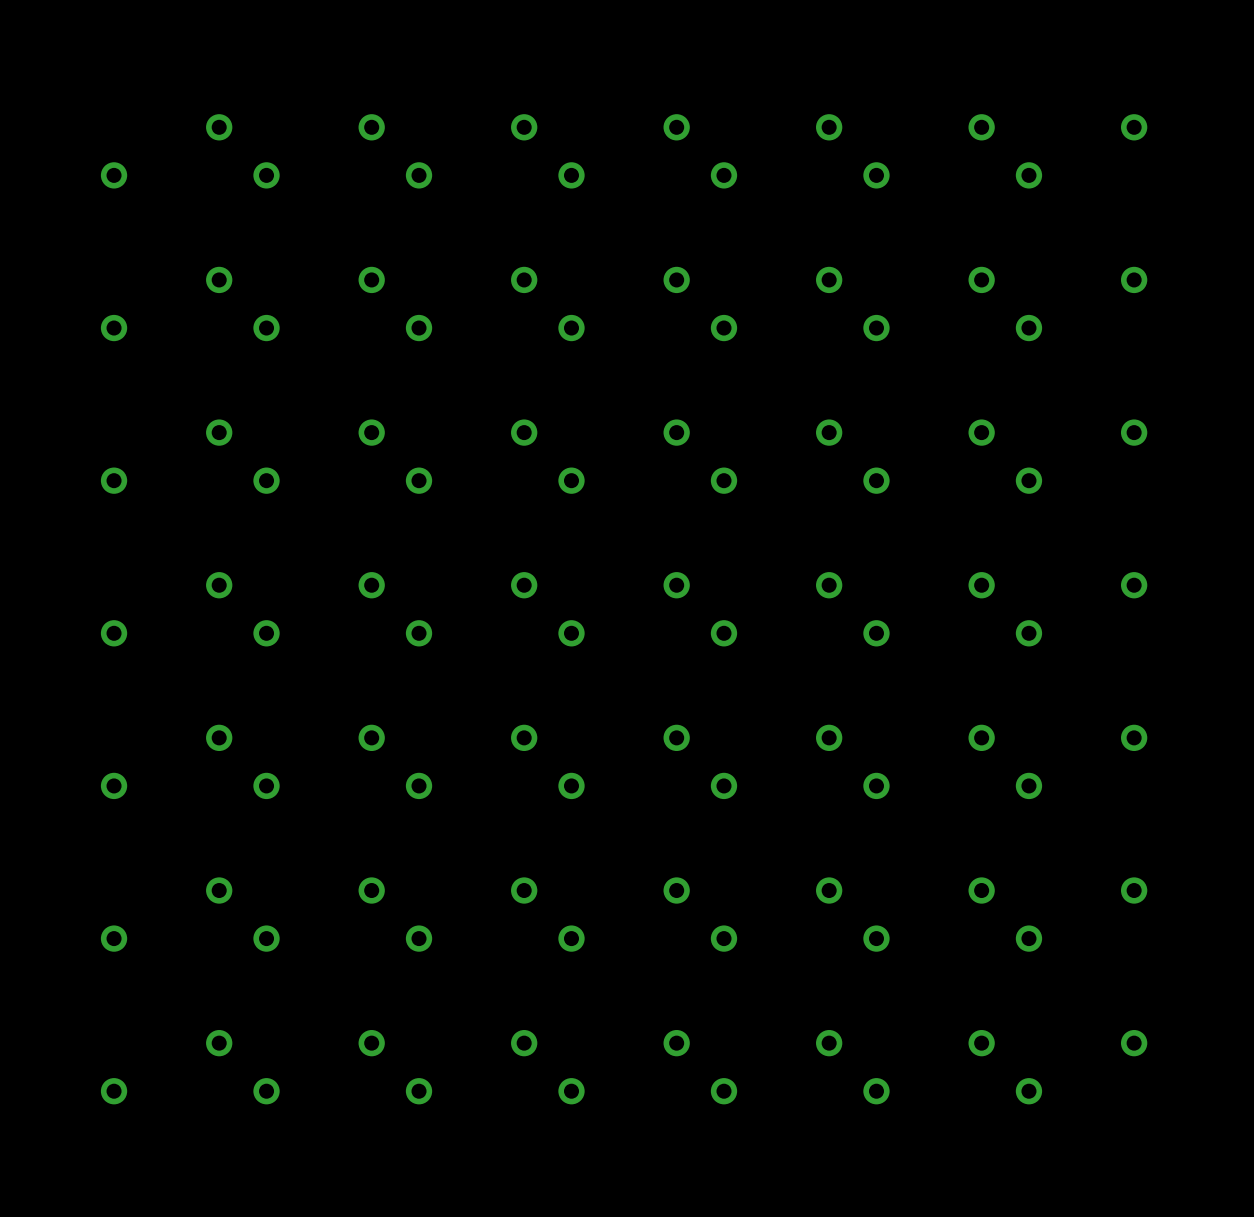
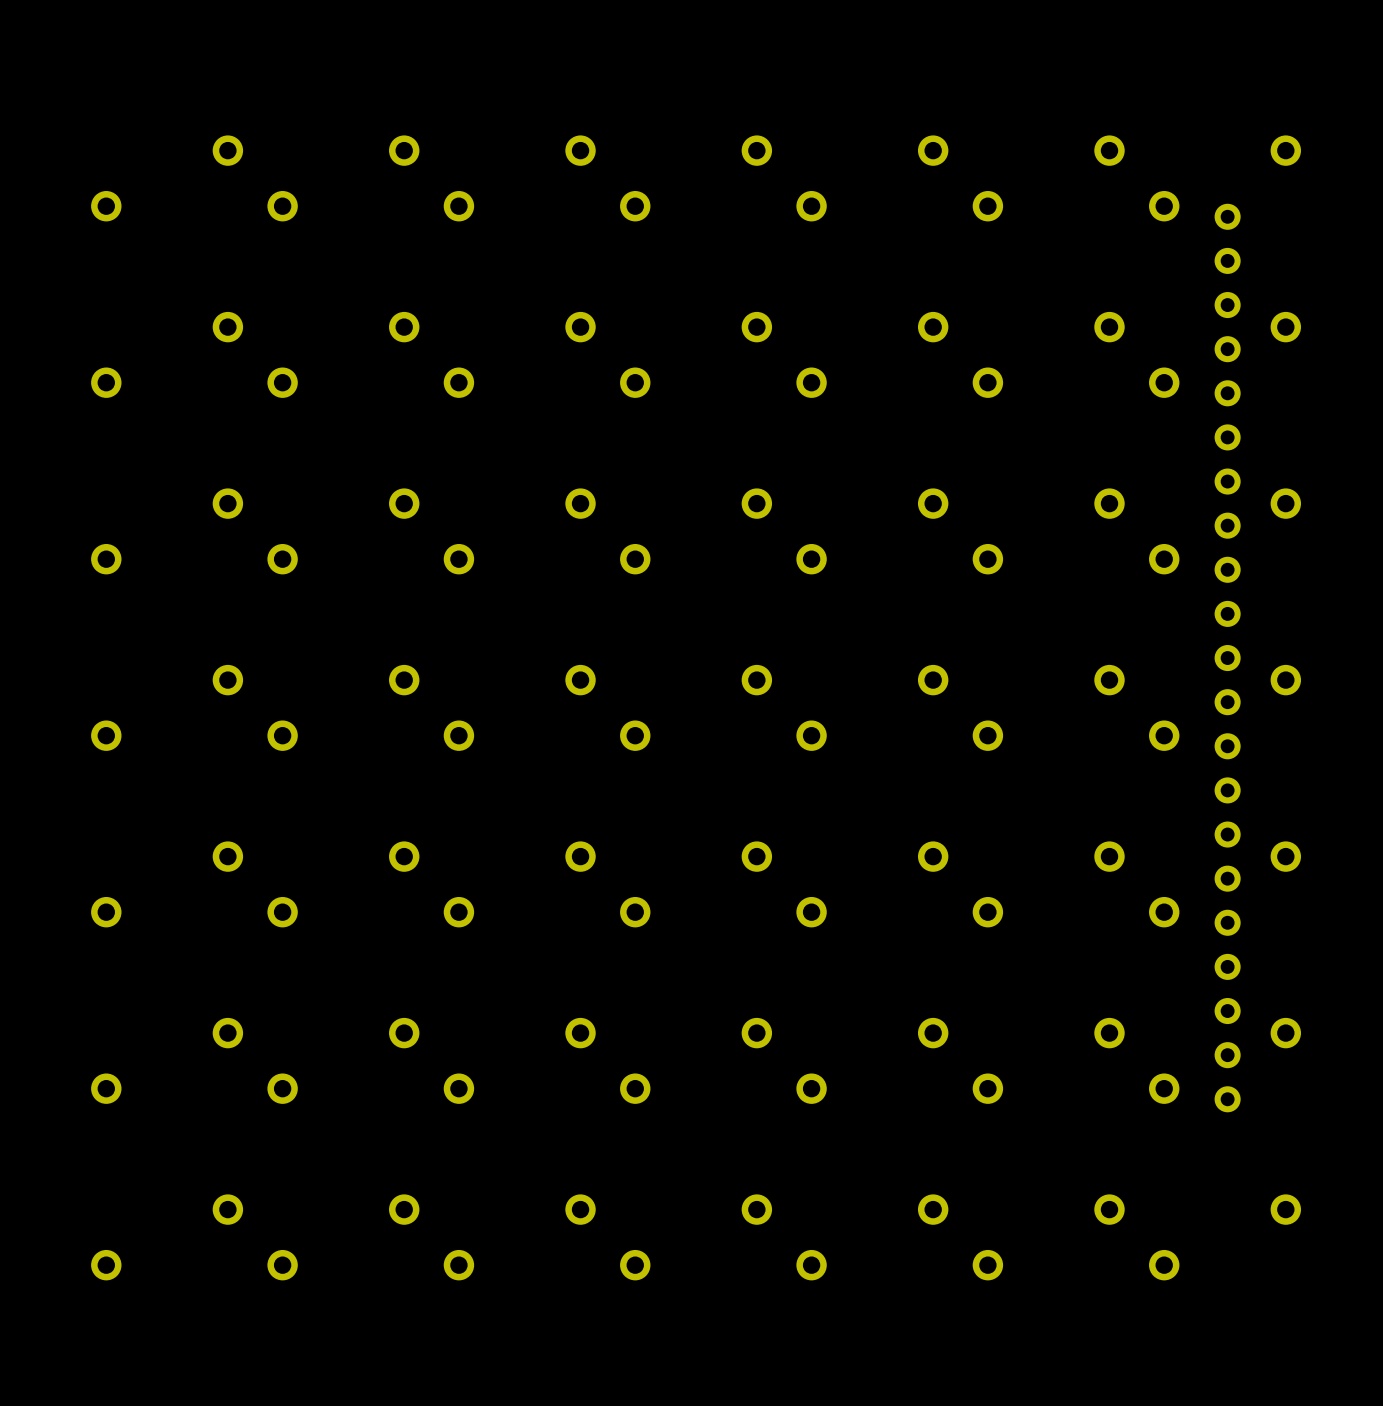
part: none -> (1227, 658)

